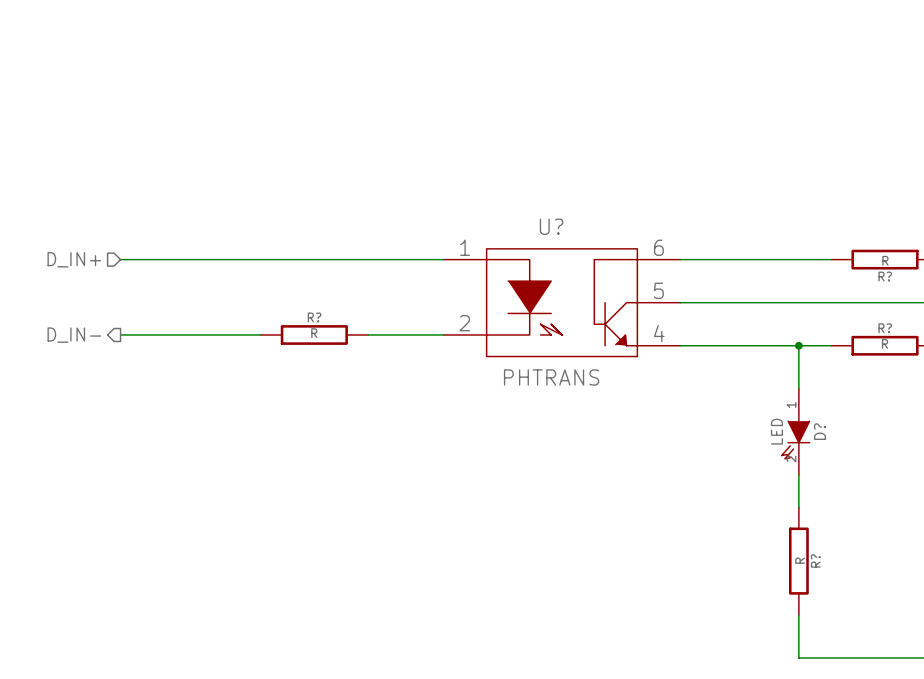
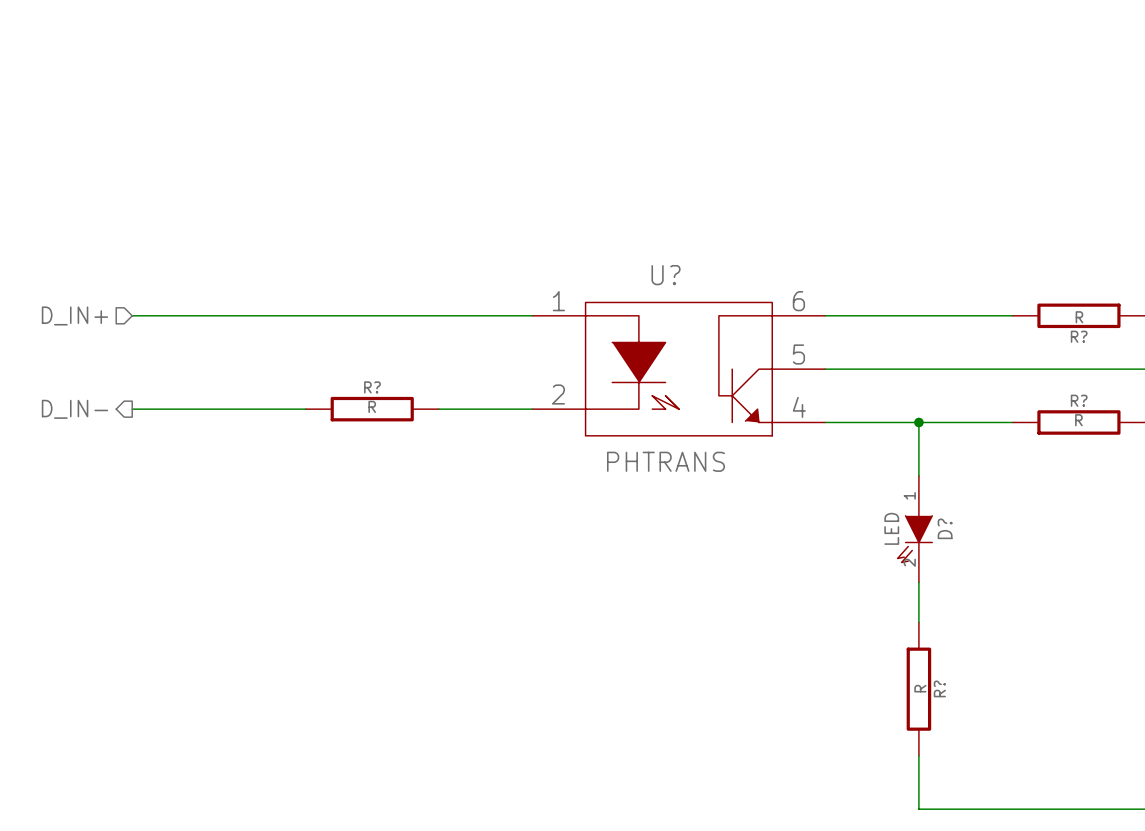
wire: (798, 345) (798, 388) -> (918, 422) (918, 475)
junction position: (798, 345) -> (918, 422)
D? position: (795, 431) -> (914, 529)
wire: (798, 474) (798, 507) -> (918, 582) (918, 622)
R? position: (798, 561) -> (918, 689)
wire: (798, 614) (798, 658) -> (918, 755) (918, 809) (972, 809)

